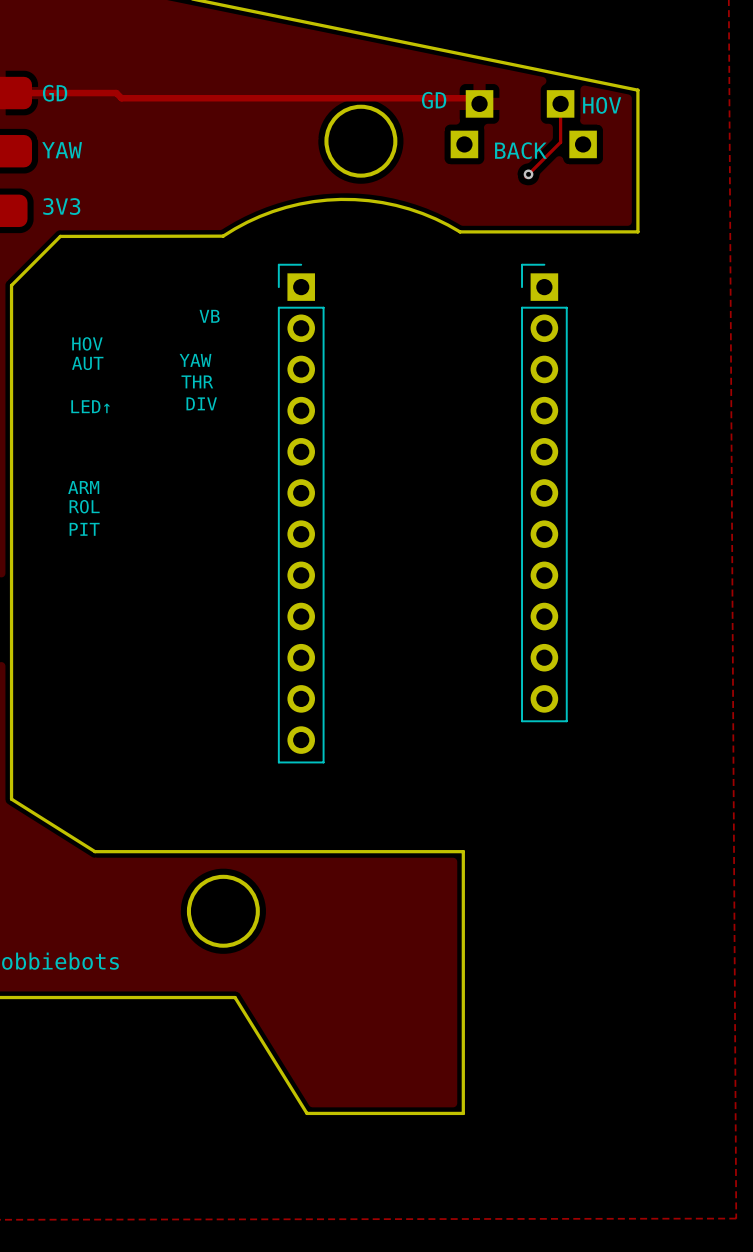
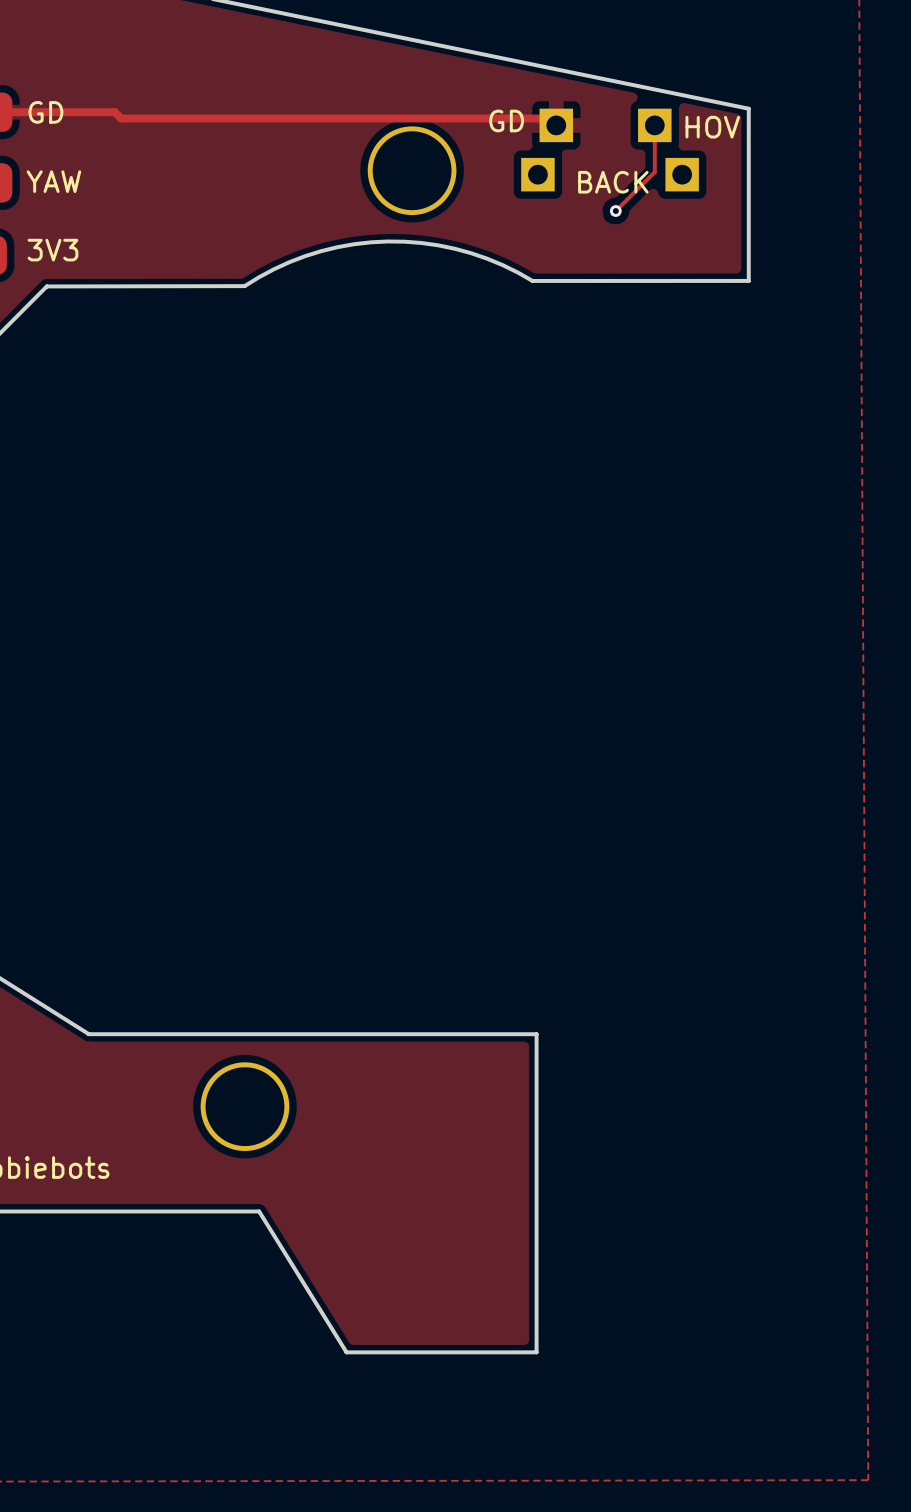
text: VB (209, 316) -> none
text: HOV (87, 343) -> none
text: YAW (195, 360) -> none
text: AUT (87, 363) -> none
text: THR (197, 381) -> none
text: DIV (201, 403) -> none
text: LED↑ (90, 406) -> none
text: ARM (83, 487) -> none
part: (544, 493) -> none
text: ROL (84, 506) -> none
part: (301, 513) -> none
text: PIT (84, 529) -> none

